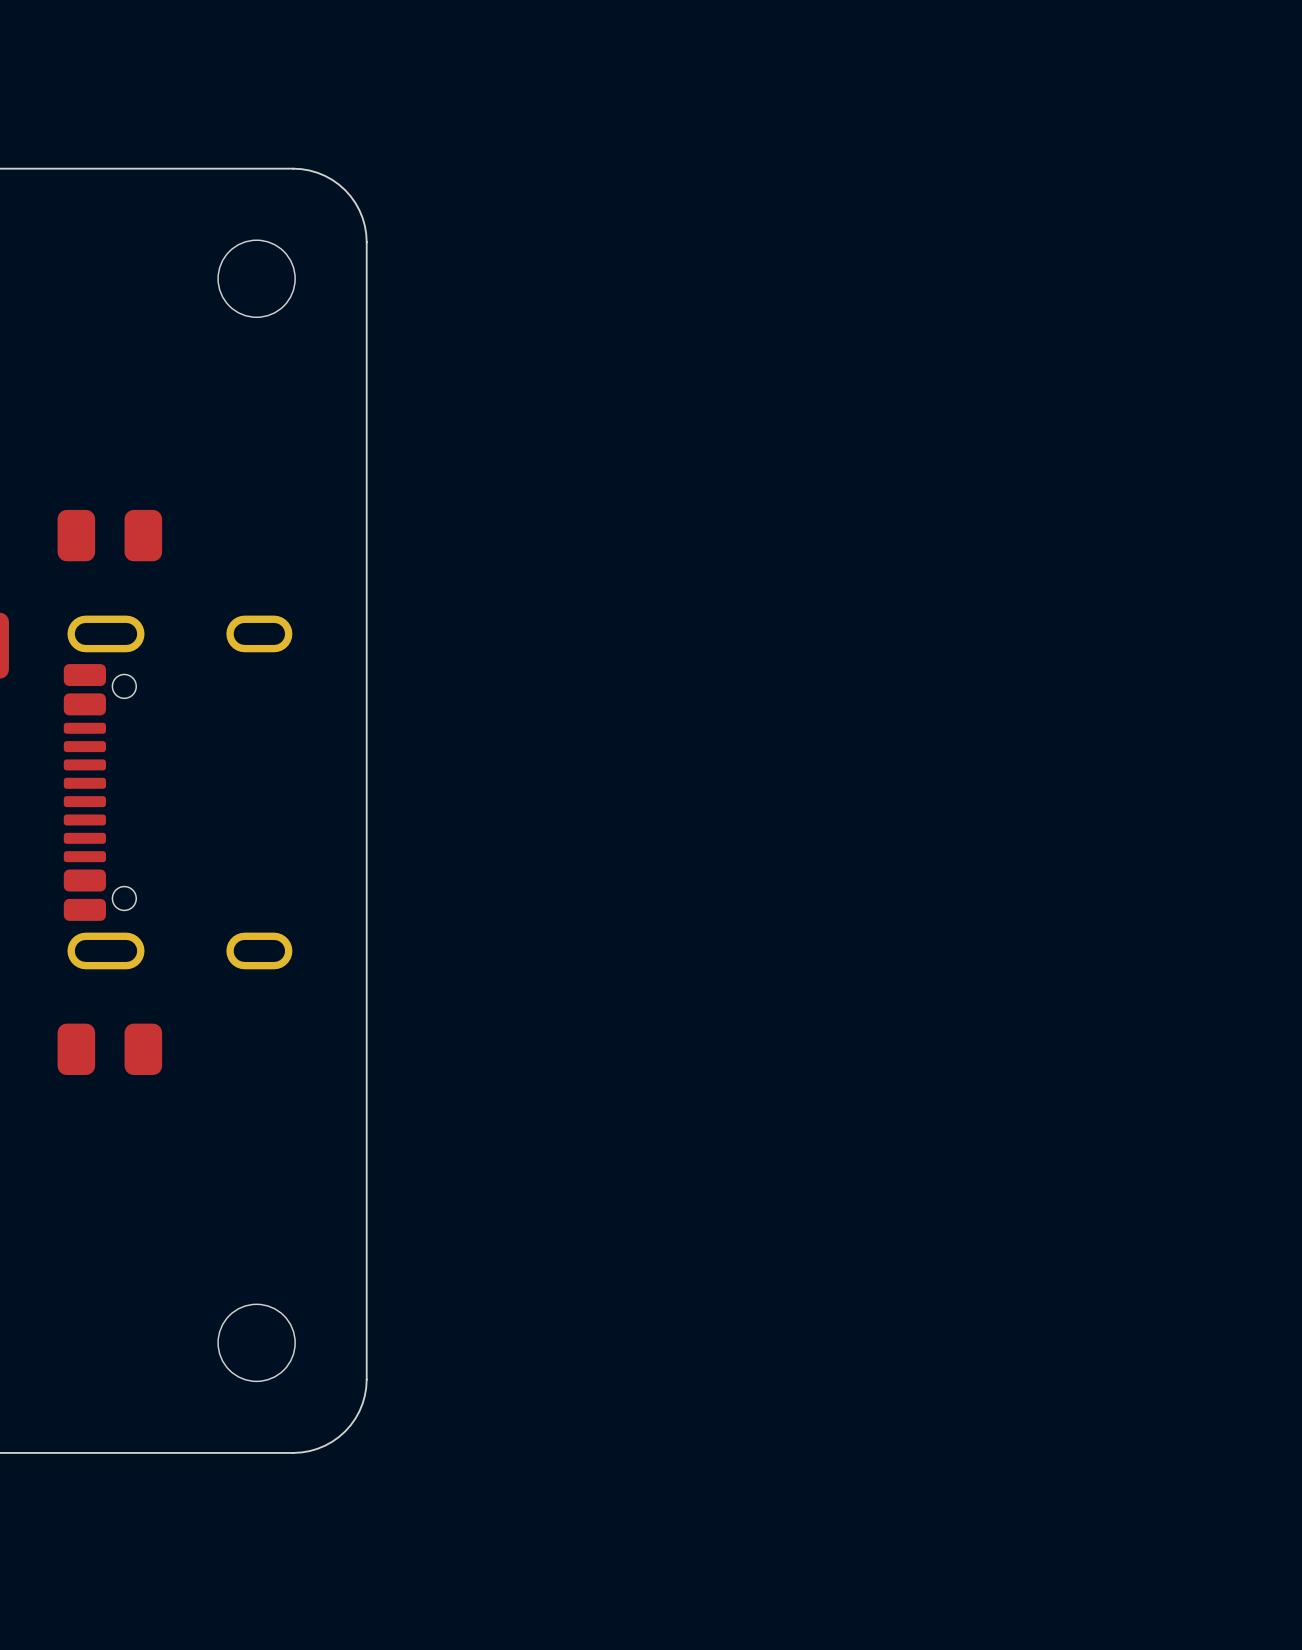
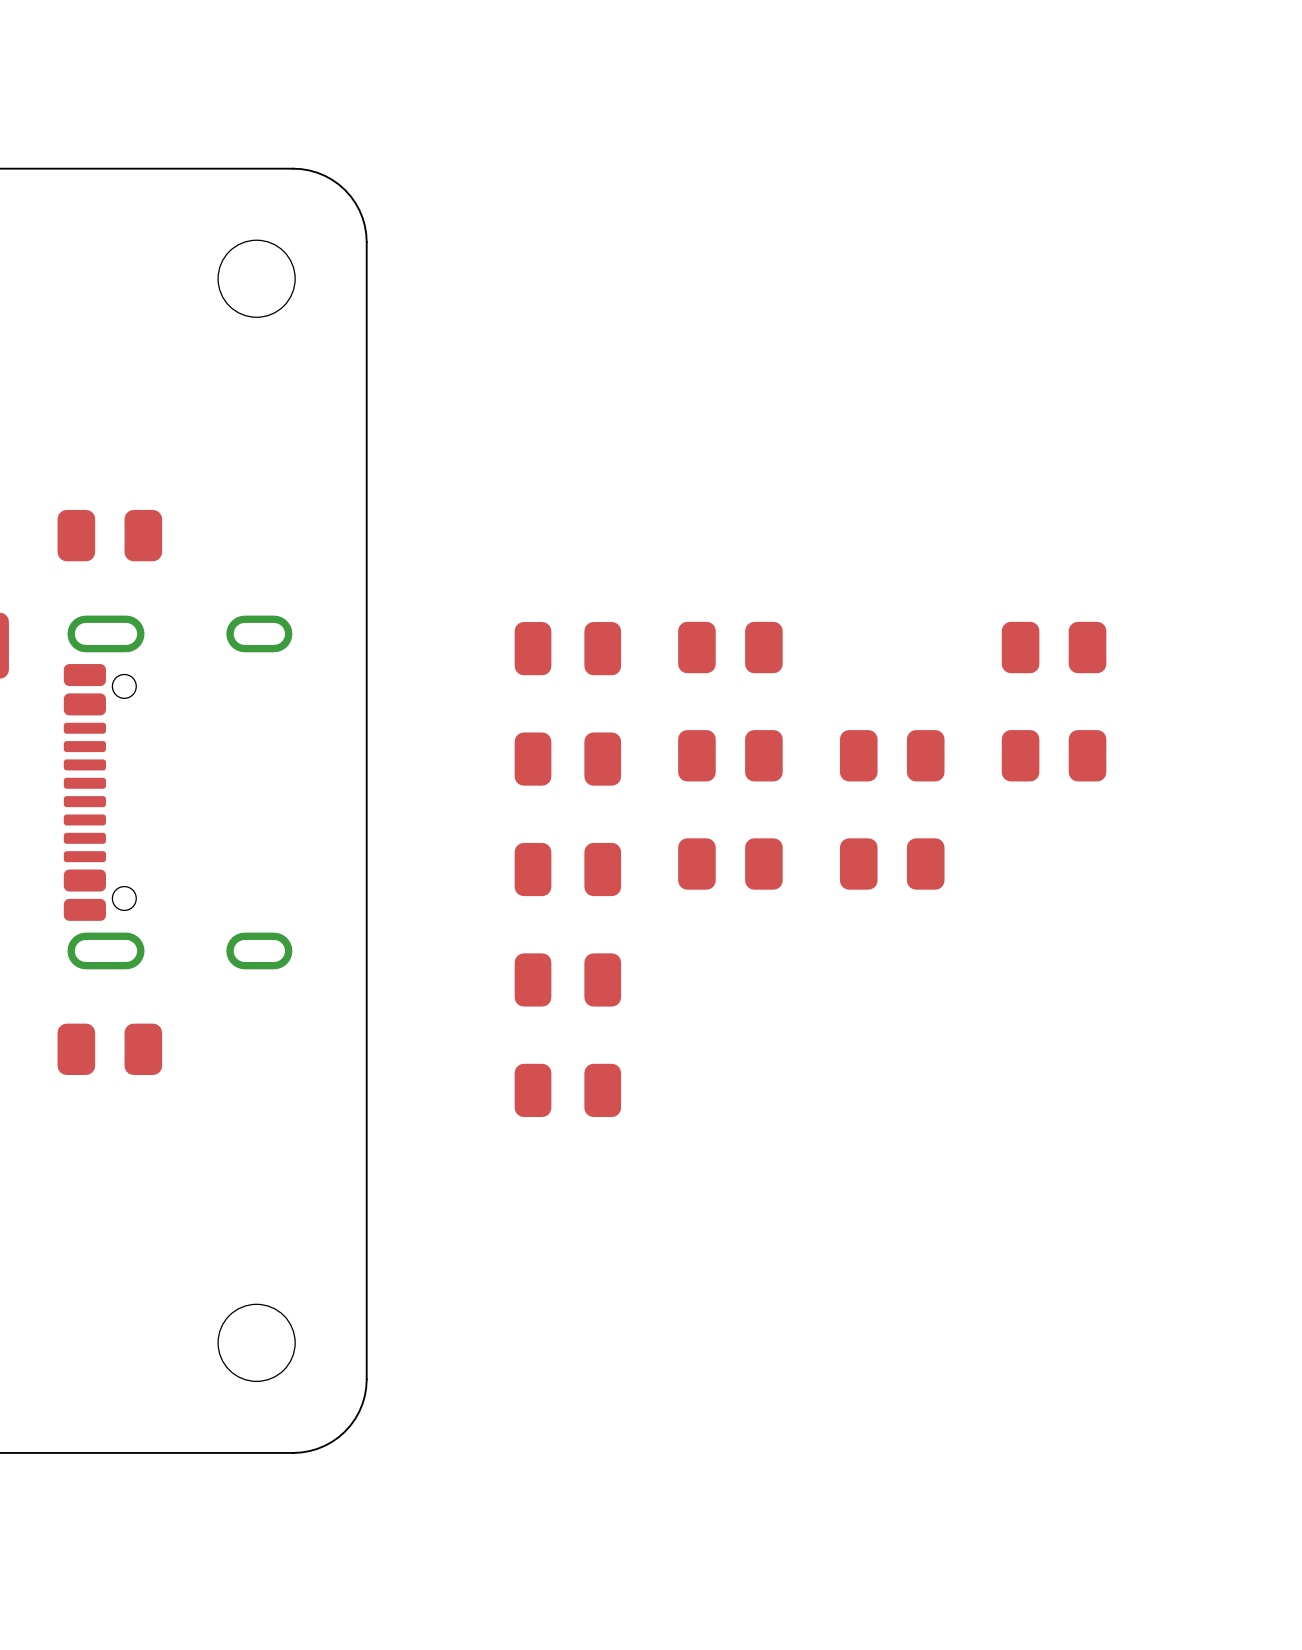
part: none -> (730, 647)
part: none -> (1054, 647)
part: none -> (567, 648)
part: none -> (730, 755)
part: none -> (892, 755)
part: none -> (1054, 755)
part: none -> (567, 759)
part: none -> (730, 864)
part: none -> (892, 864)
part: none -> (567, 869)
part: none -> (567, 979)
part: none -> (567, 1090)

